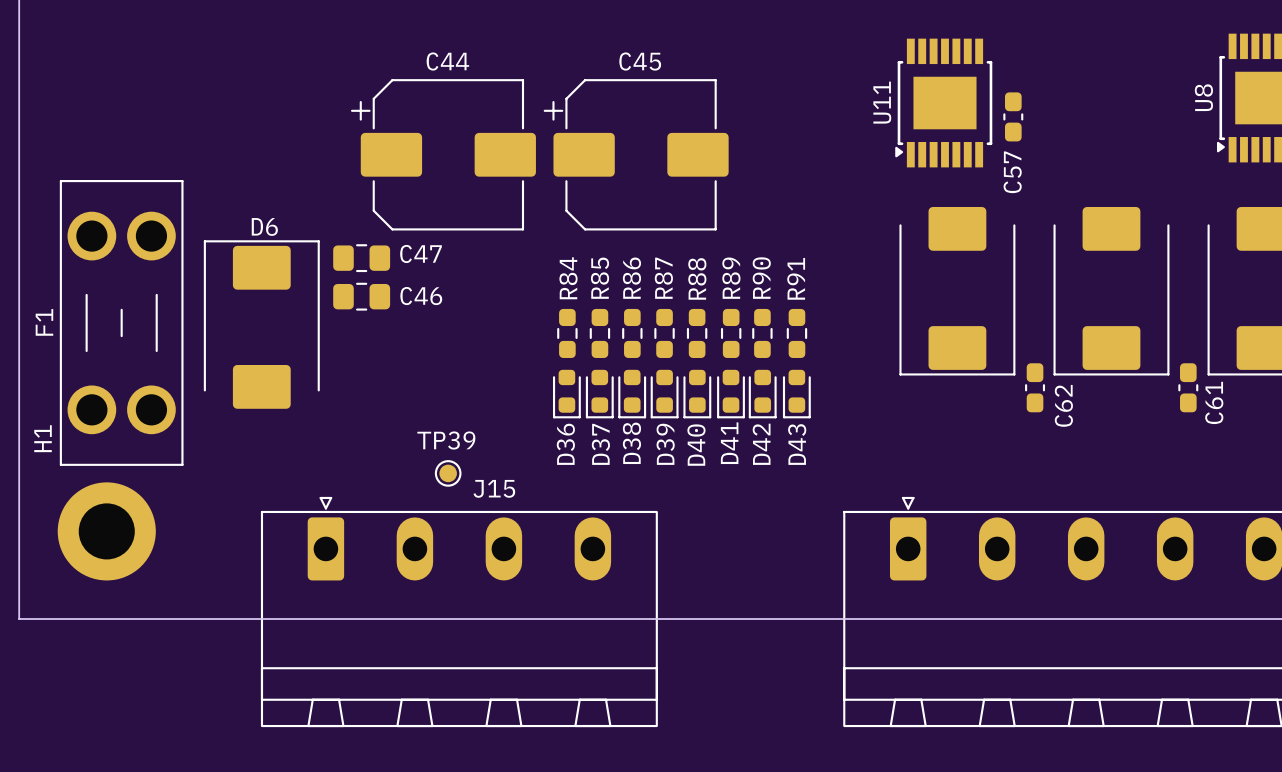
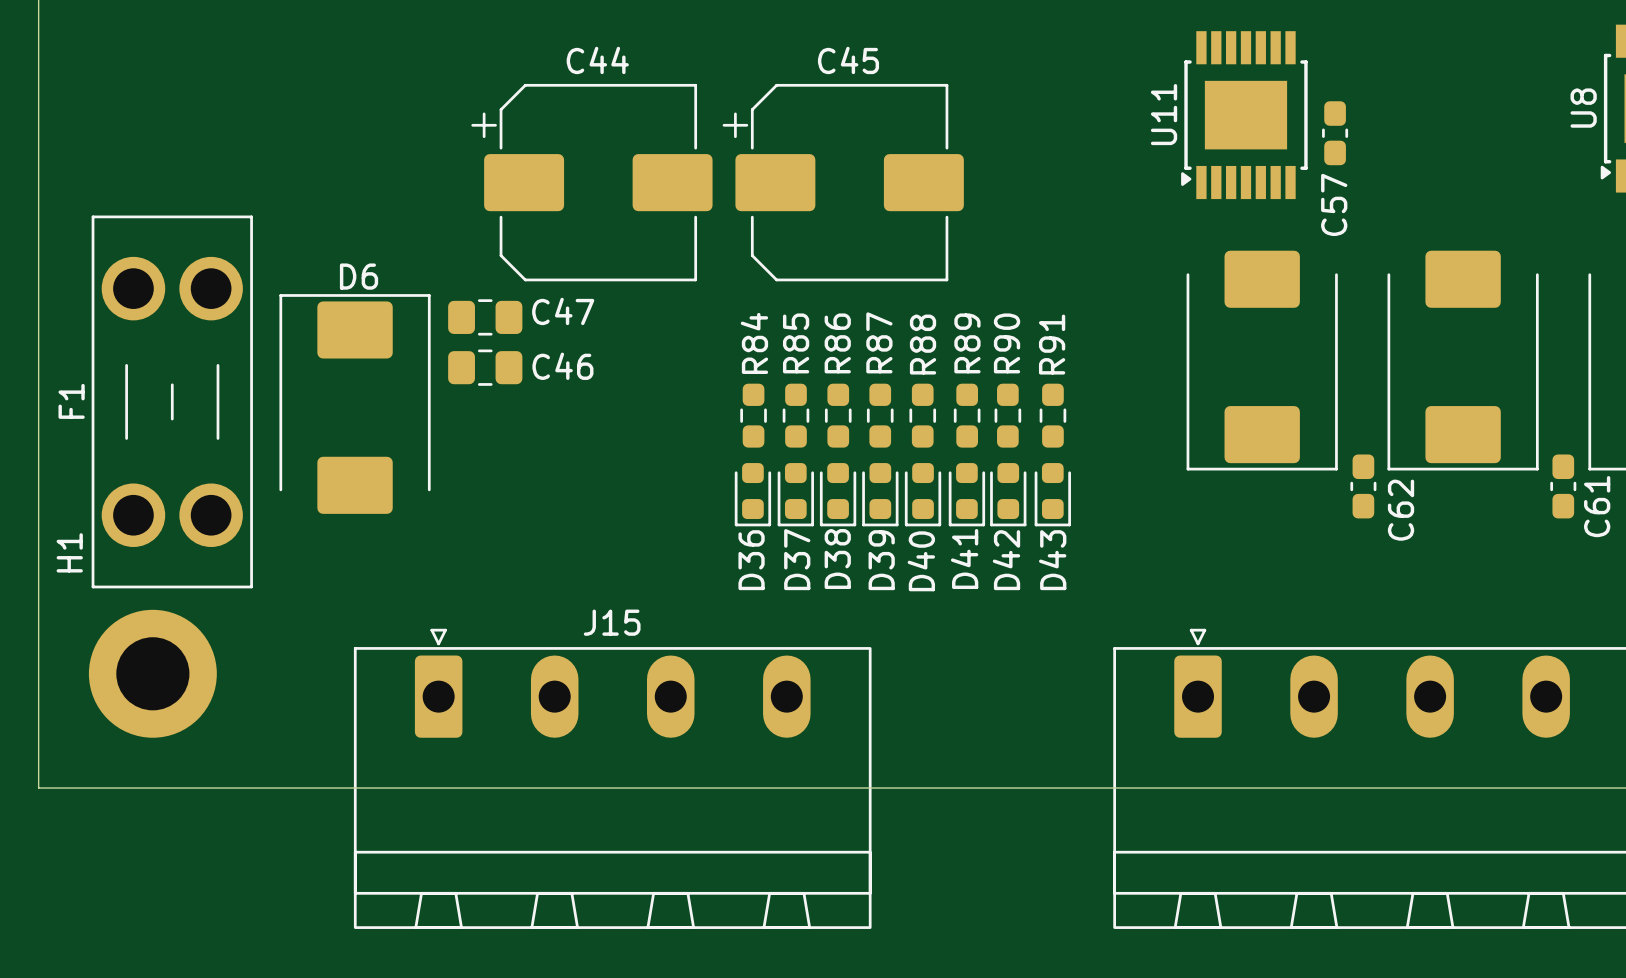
TP39: (448, 473) -> none
J15 name position: J15 (494, 488) -> J15 (612, 622)

